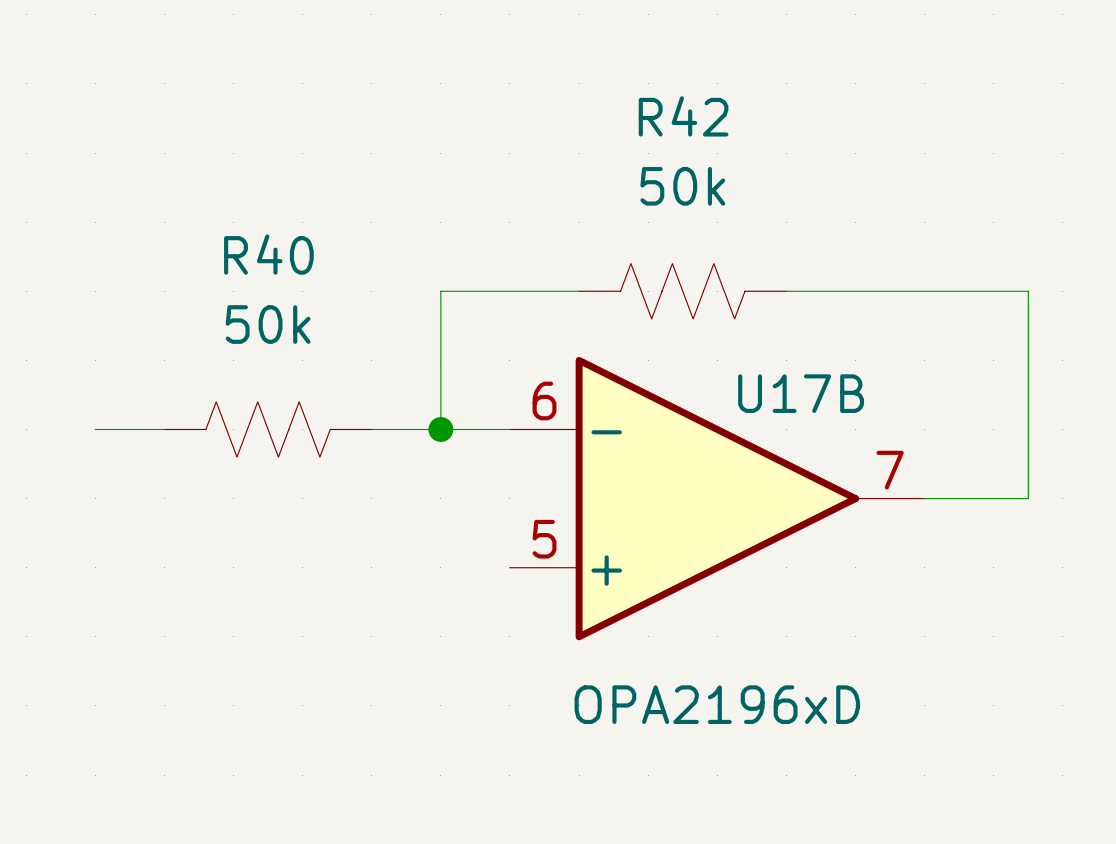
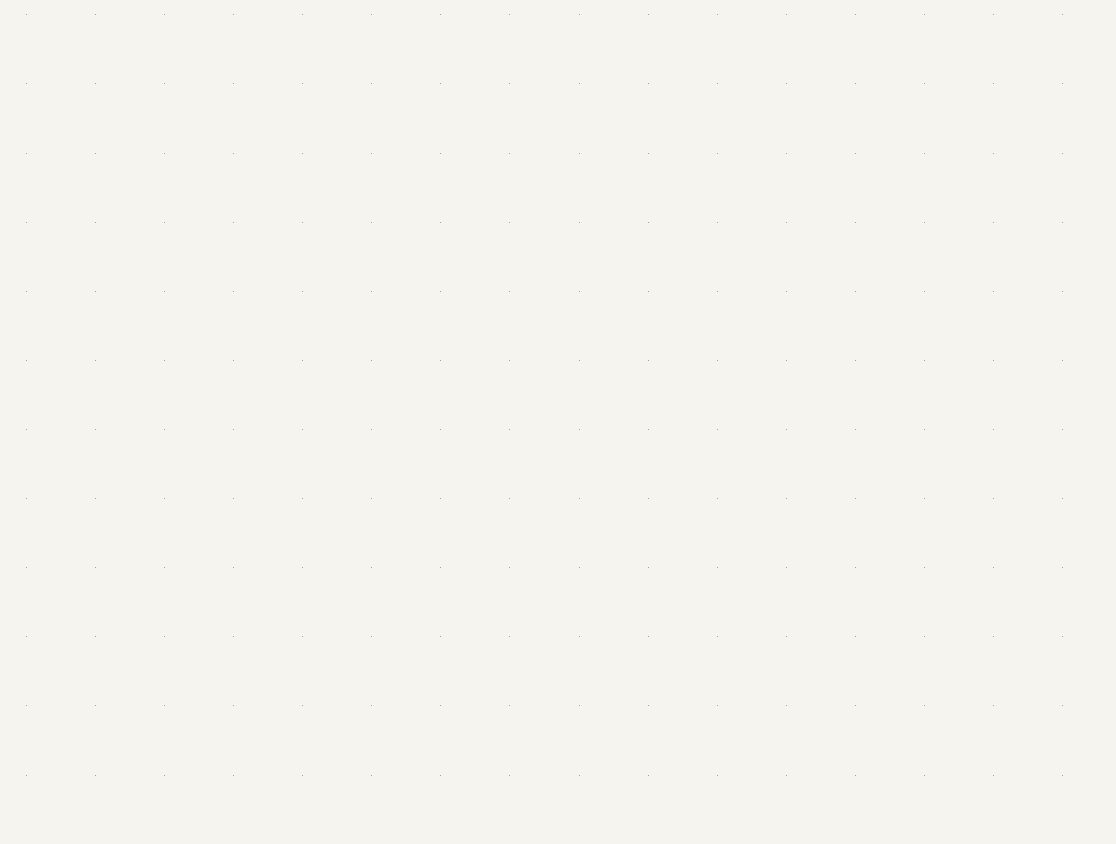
wire: (579, 291) (440, 291) (440, 429) -> none
R42: 50k (682, 291) -> none
wire: (786, 291) (1028, 291) (1028, 498) (924, 498) -> none
wire: (95, 429) (164, 429) -> none
R40: 50k (268, 429) -> none
wire: (371, 429) (509, 429) -> none
junction: (440, 429) -> none
U17B: OPA2196xD (717, 498) -> none

